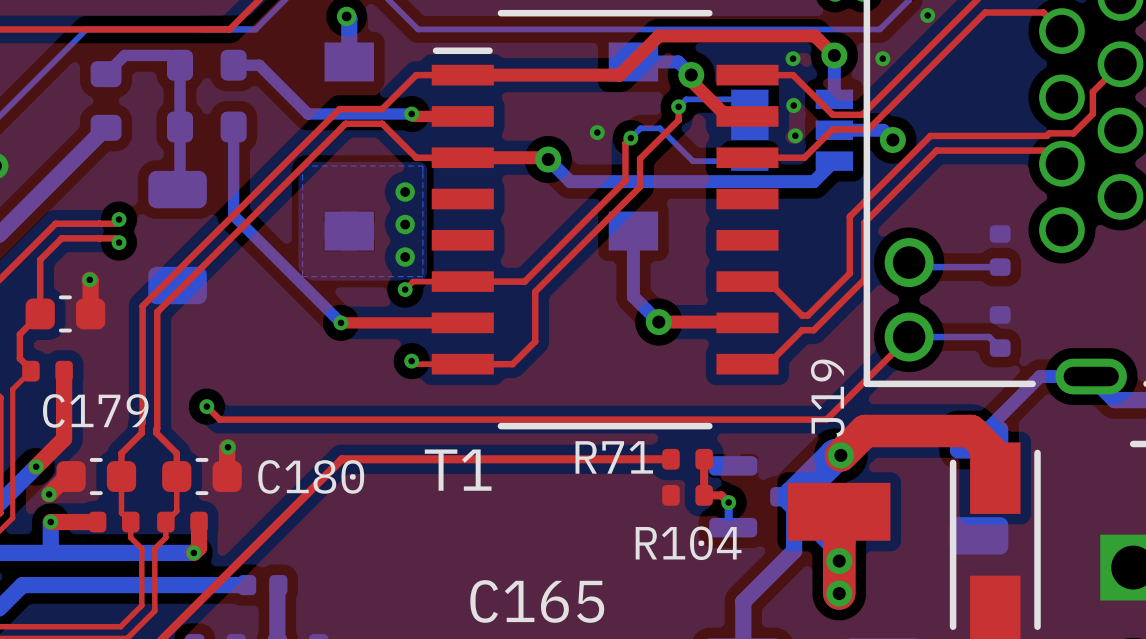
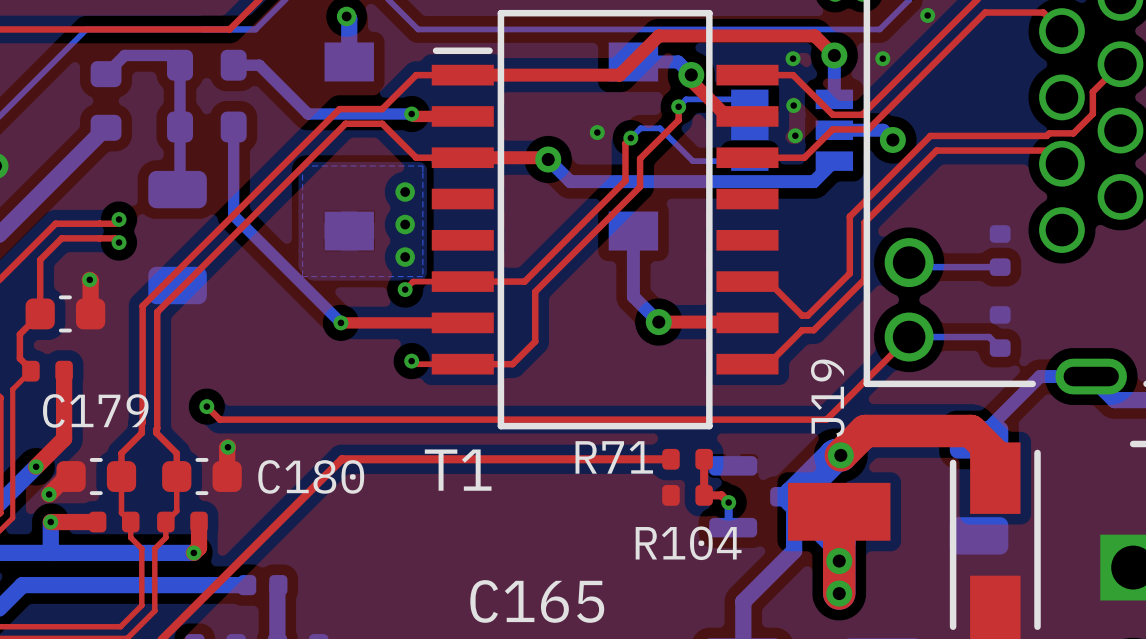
T1 footprint: [431, 9, 779, 430] -> [431, 9, 779, 430]

